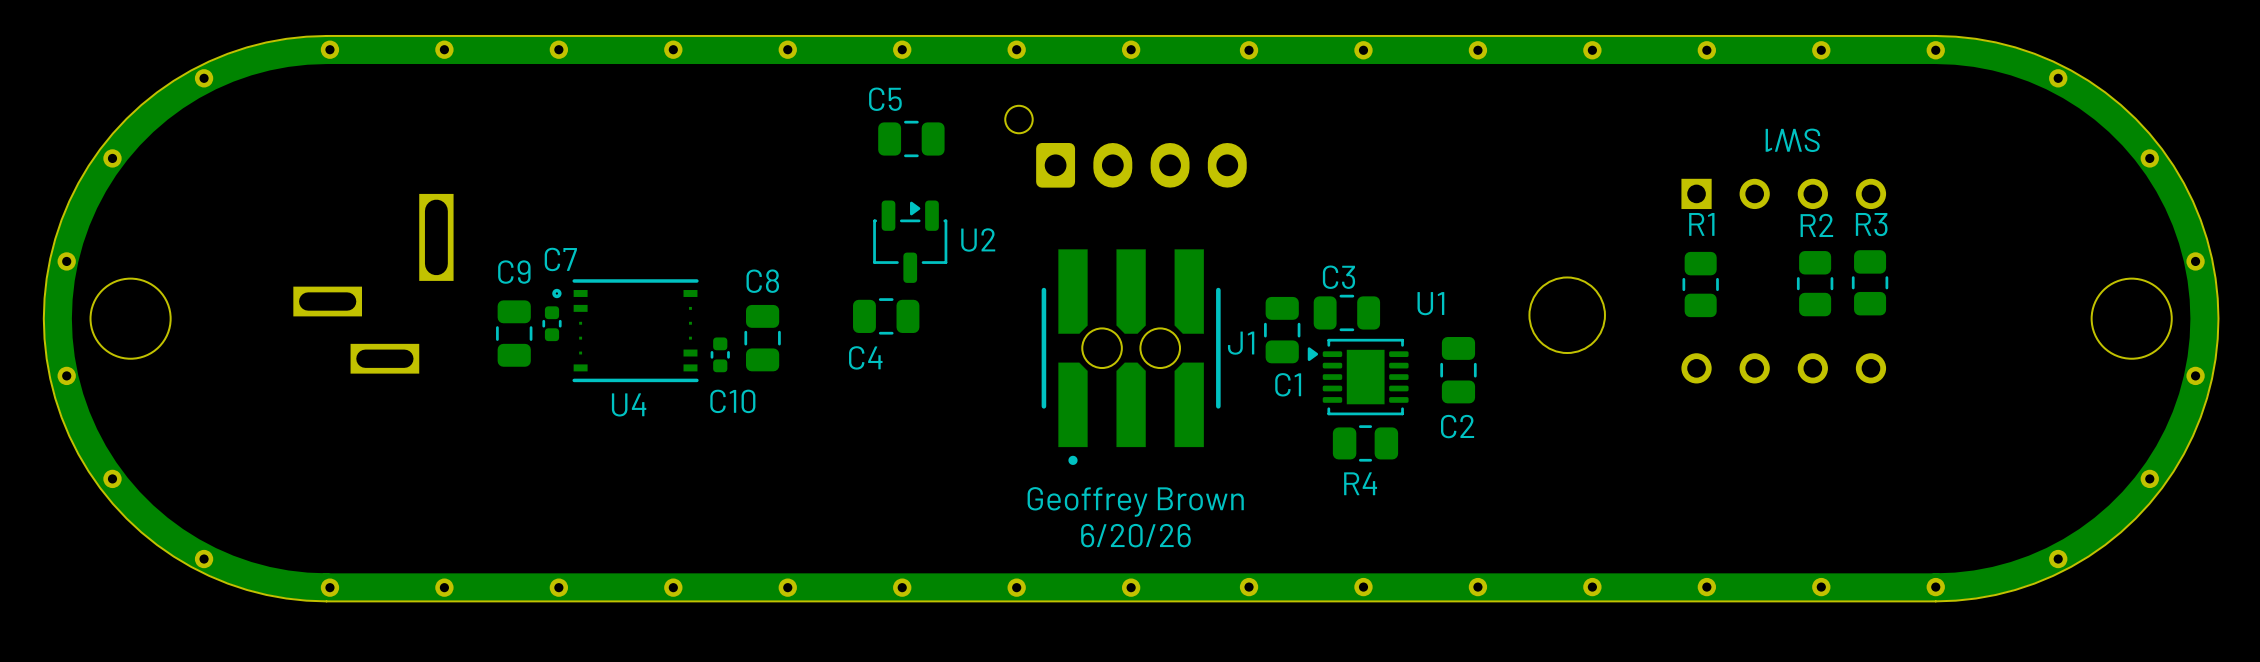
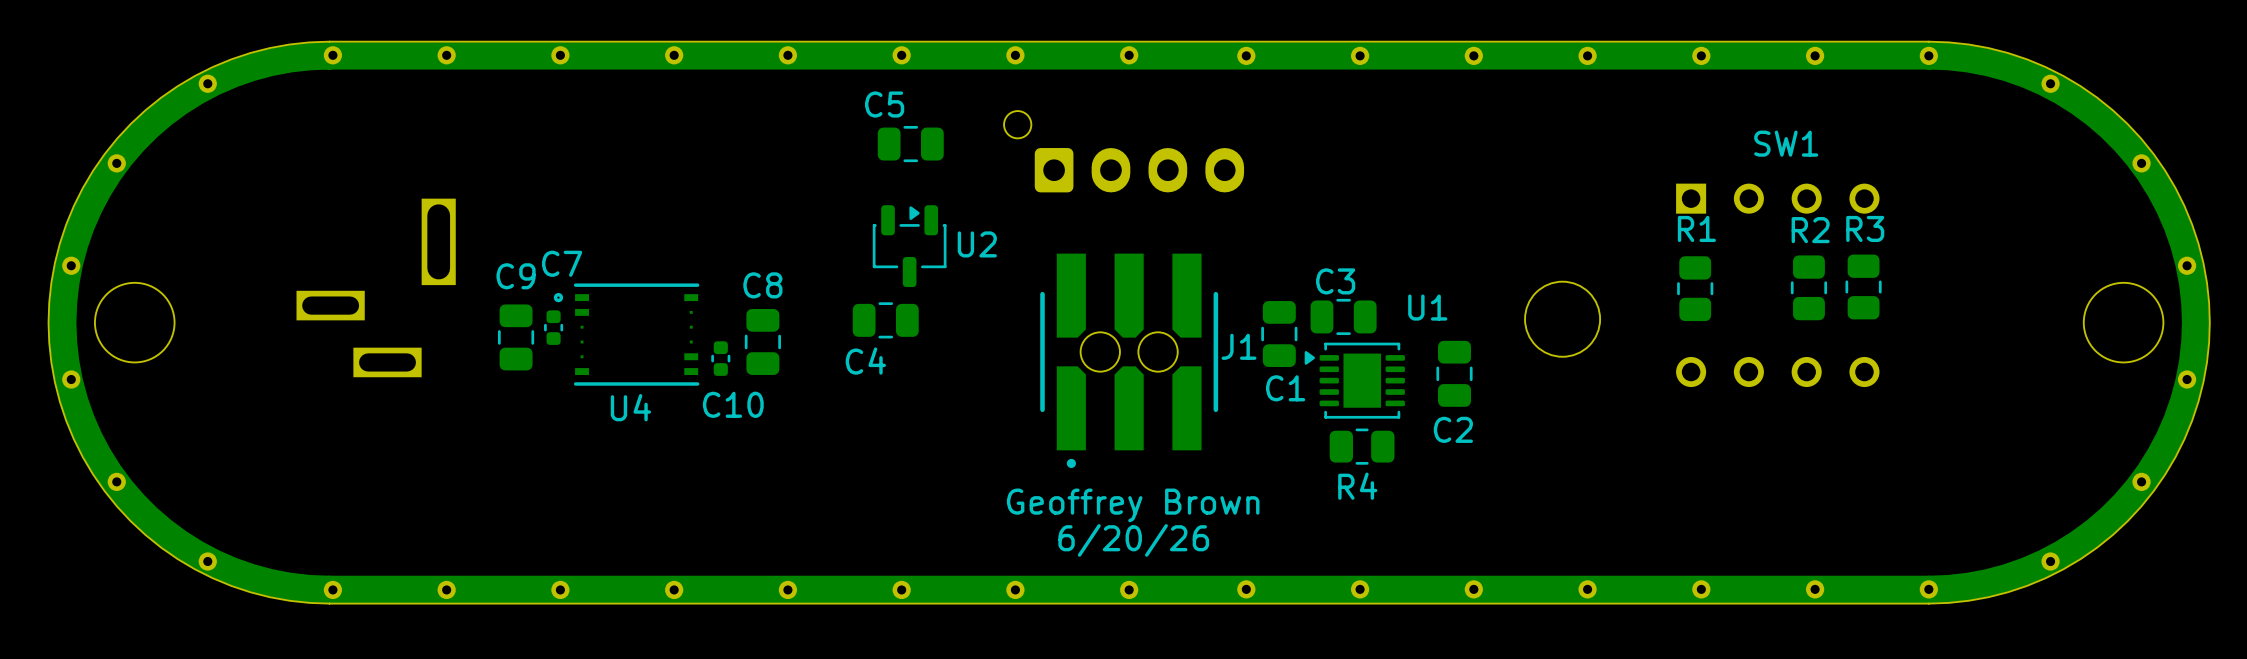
SW1 name rotation: 0° (1792, 140) -> 180° (1786, 143)

